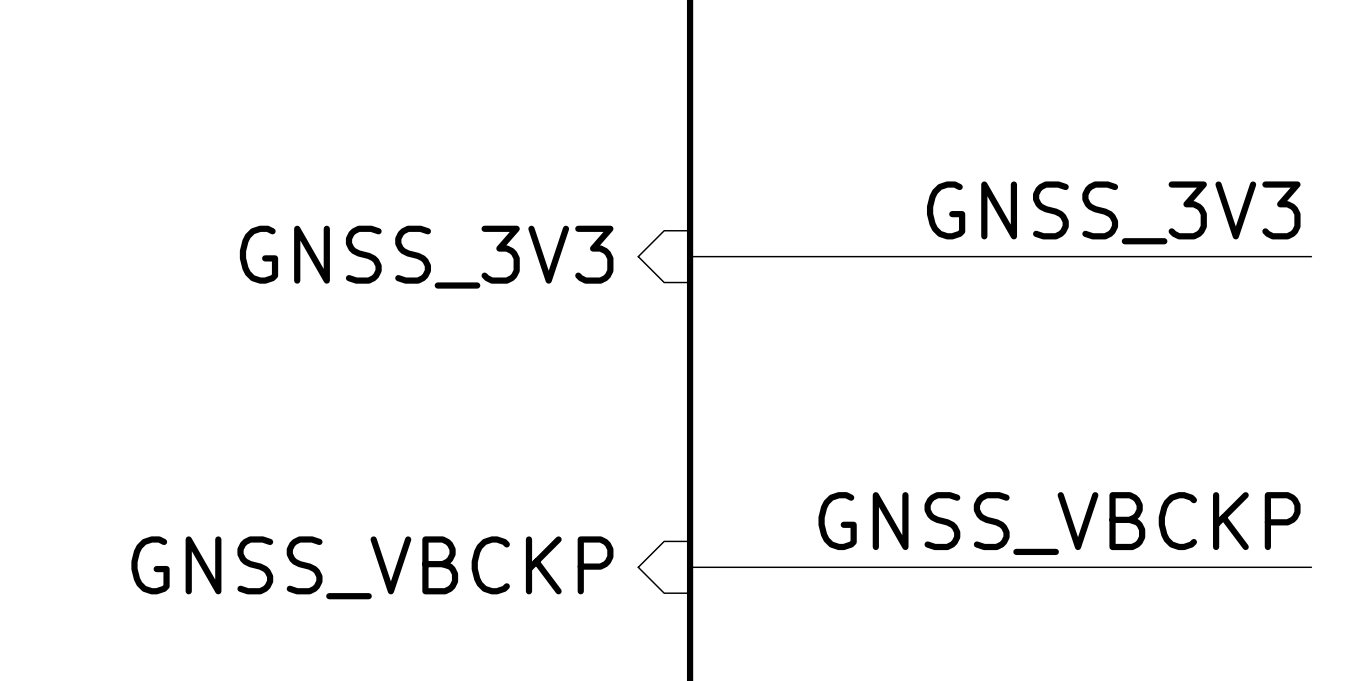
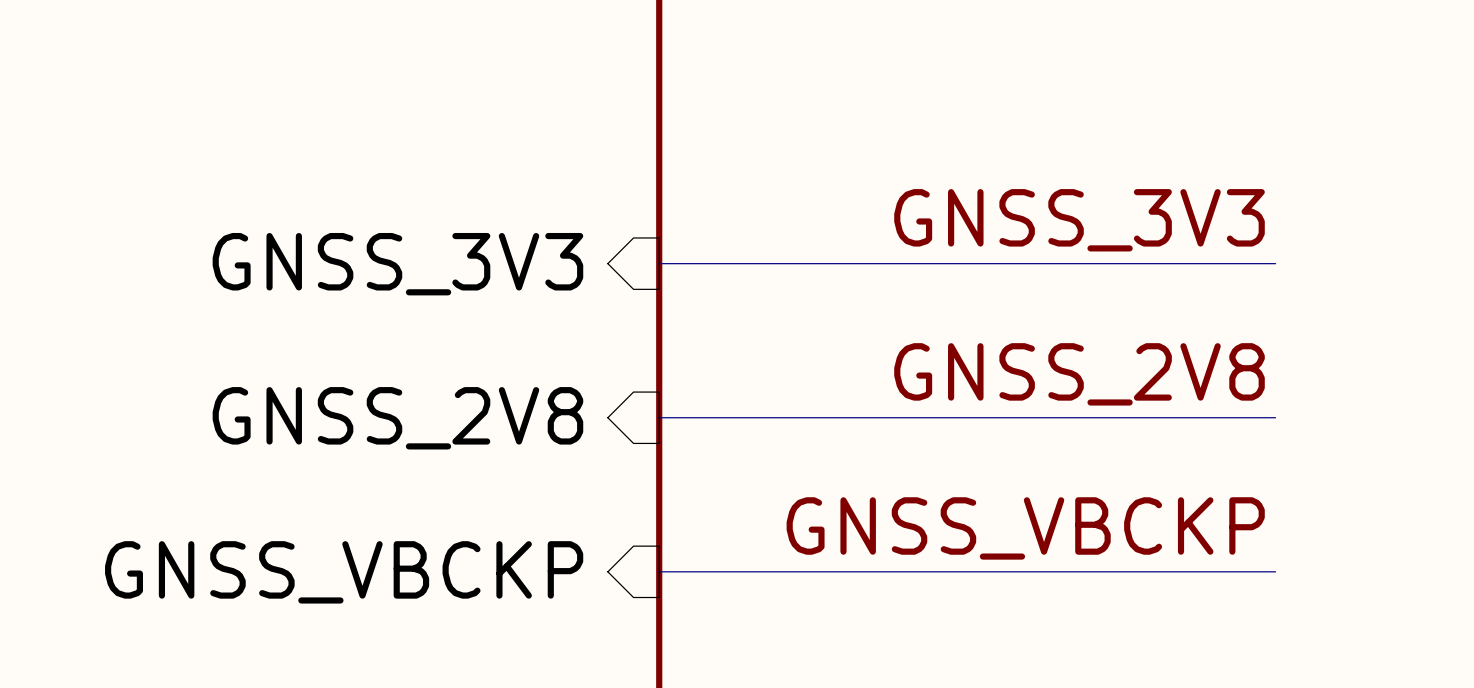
label: none -> GNSS_2V8 (1079, 374)
wire: none -> (659, 417) (1275, 417)
sheet pin: none -> GNSS_2V8 (397, 418)

